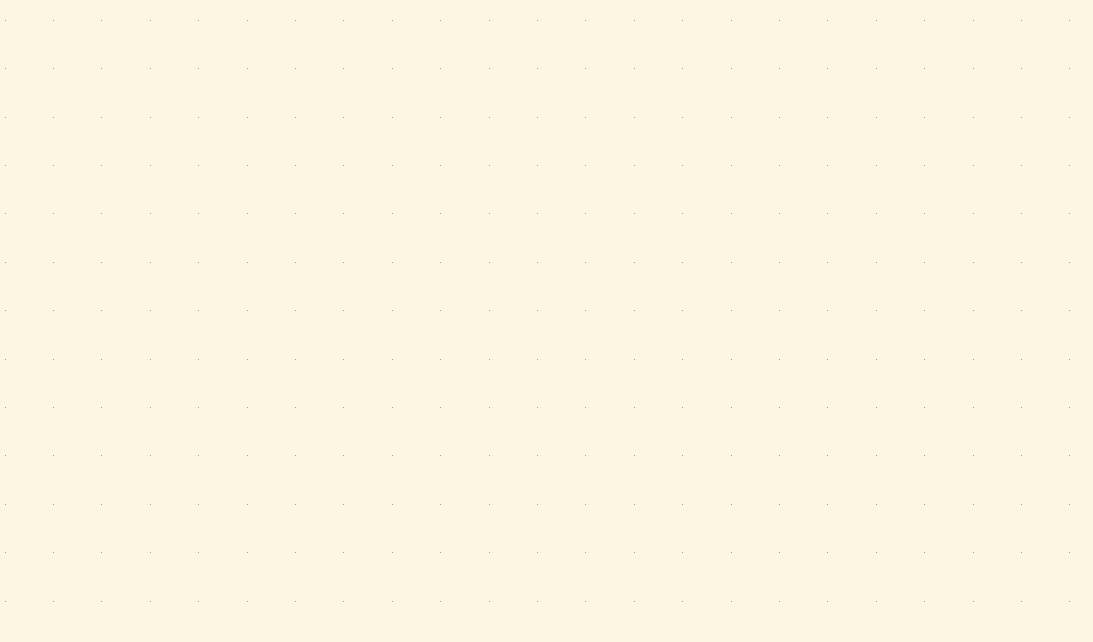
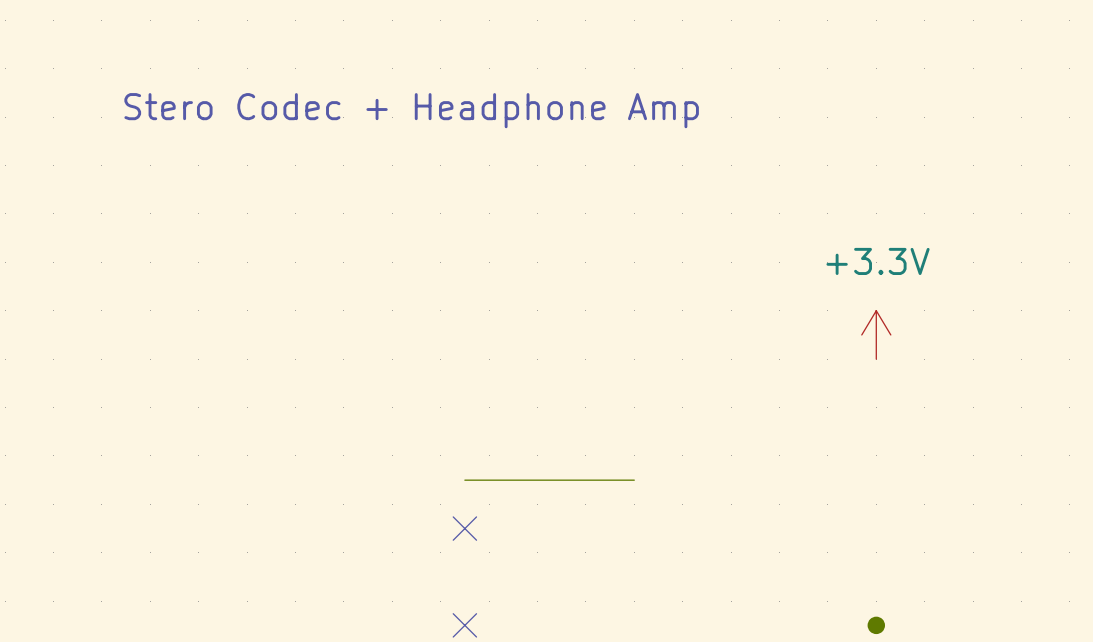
text: none -> Stero Codec + Headphone Amp (411, 110)
power symbol: none -> +3.3V (876, 334)
wire: none -> (464, 480) (634, 480)
no-connect mark: none -> (464, 528)
no-connect mark: none -> (464, 625)
junction: none -> (876, 625)

